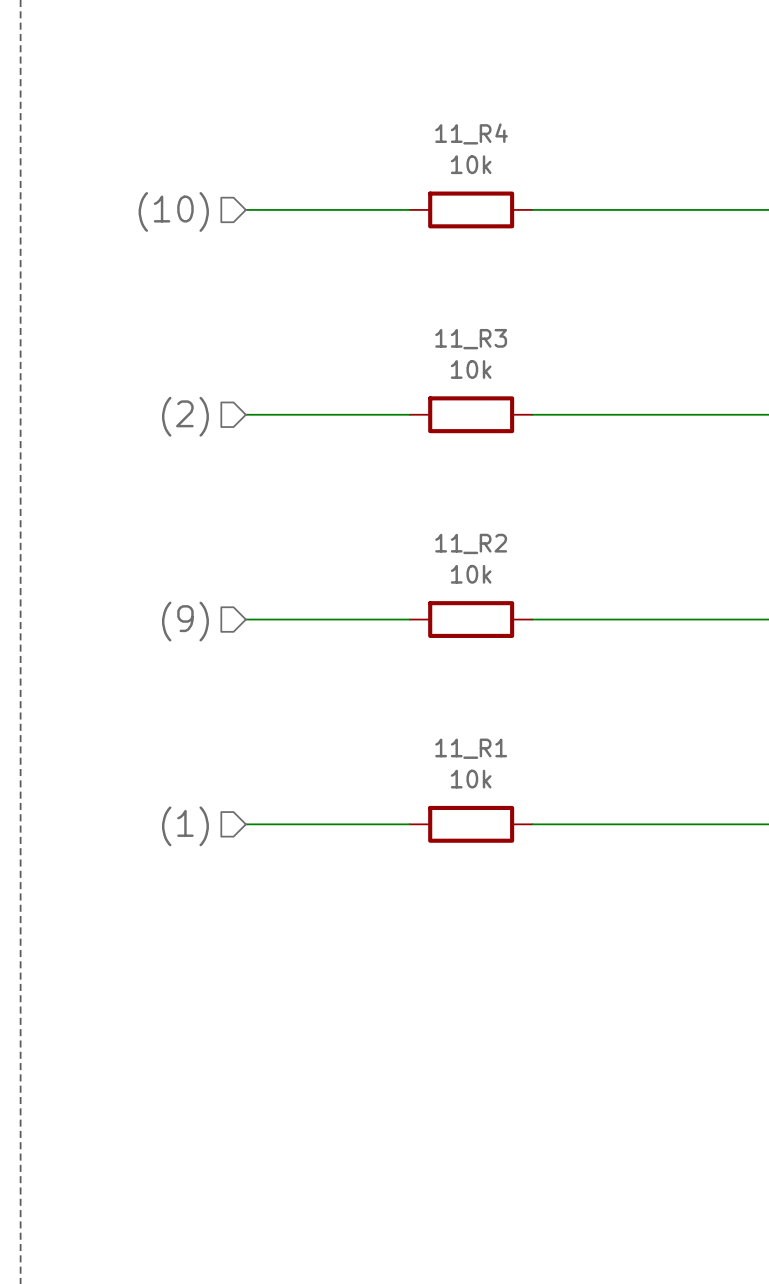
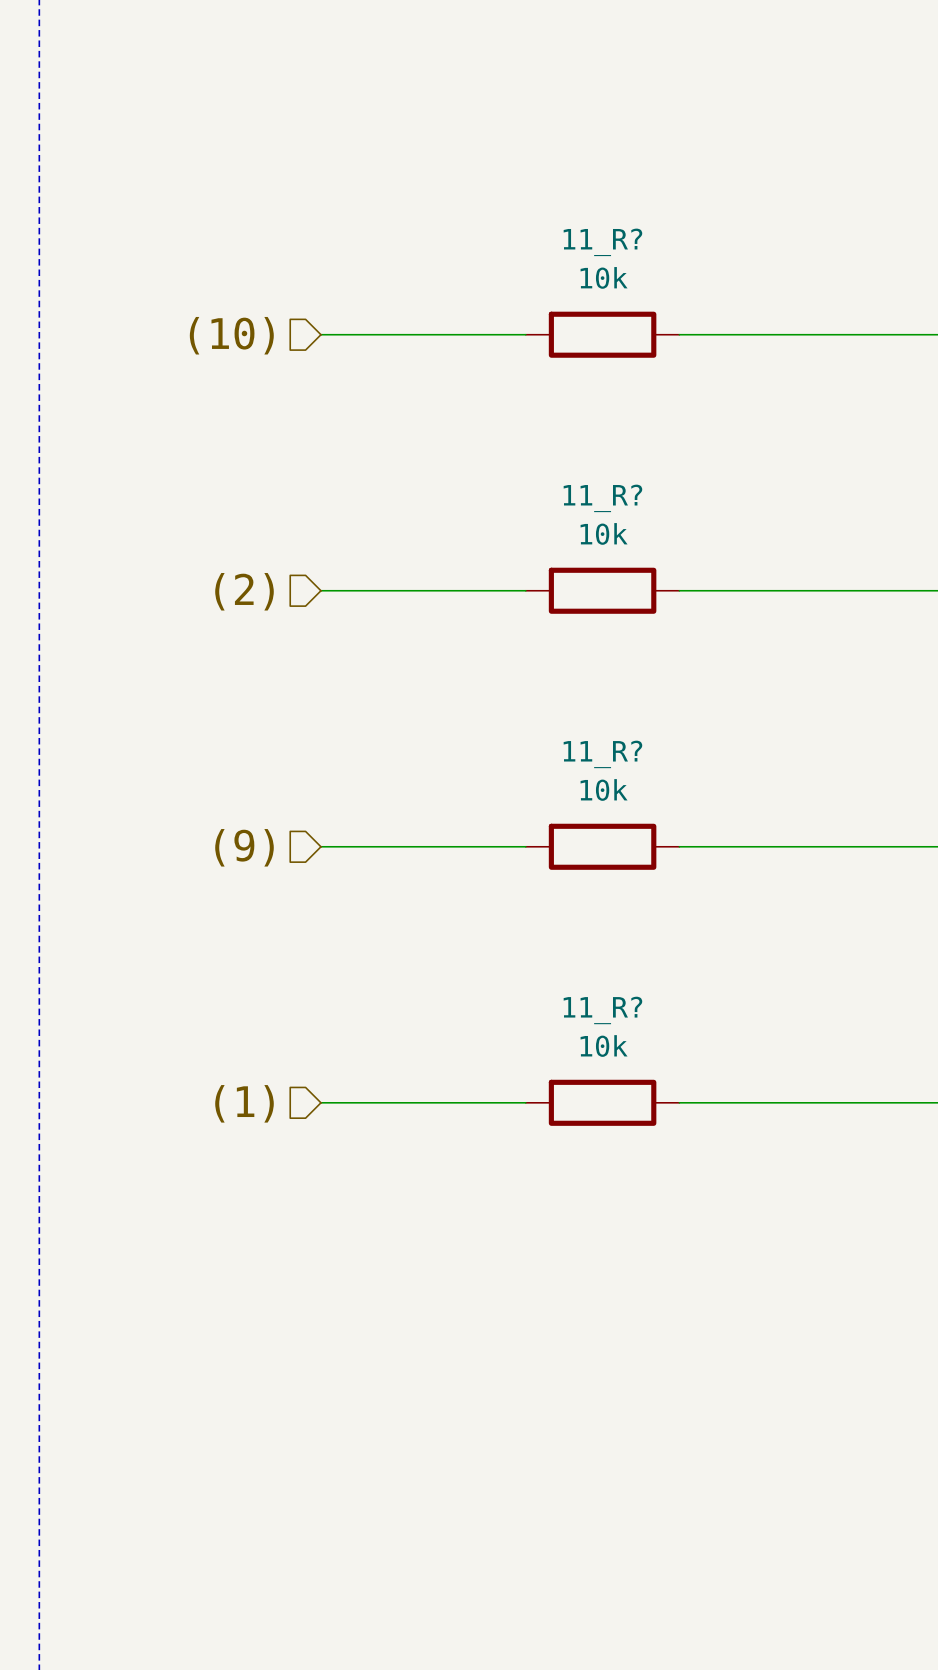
11_R4 name: 11_R4 (471, 133) -> 11_R? (602, 242)
11_R3 name: 11_R3 (471, 339) -> 11_R? (602, 498)
11_R2 name: 11_R2 (471, 543) -> 11_R? (602, 754)
11_R1 name: 11_R1 (471, 748) -> 11_R? (602, 1010)

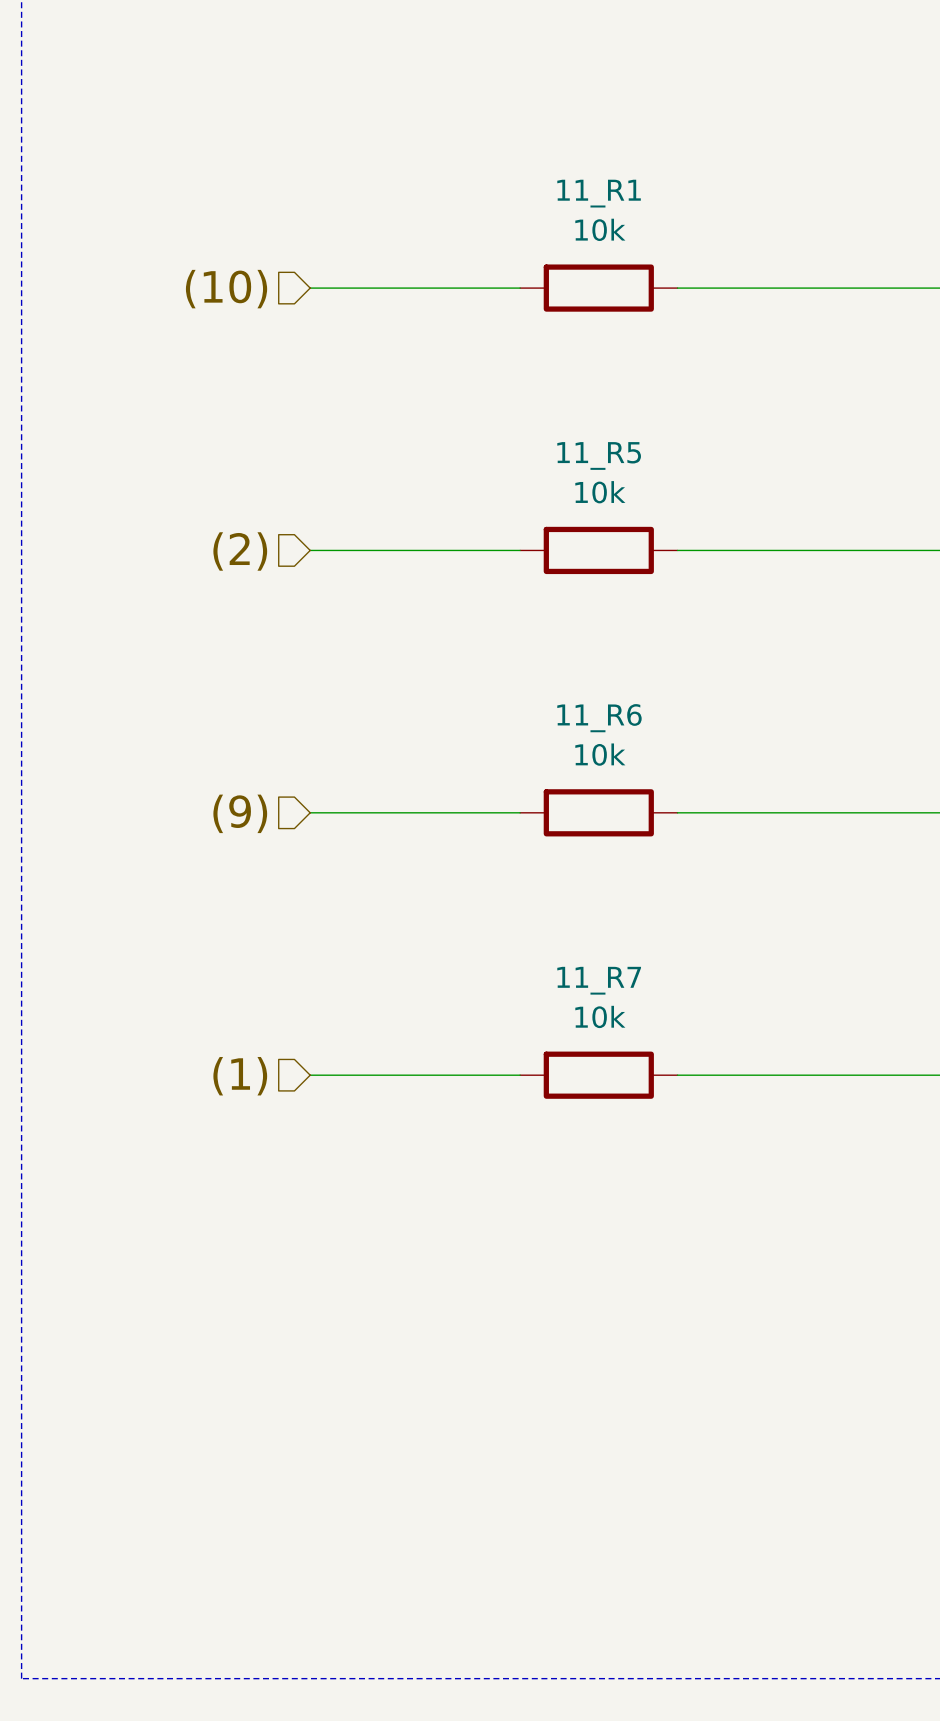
11_R? name: 11_R? (602, 242) -> 11_R1 (599, 193)
11_R? name: 11_R? (602, 498) -> 11_R5 (599, 455)
11_R? name: 11_R? (602, 754) -> 11_R6 (599, 718)
11_R? name: 11_R? (602, 1010) -> 11_R7 (599, 980)

